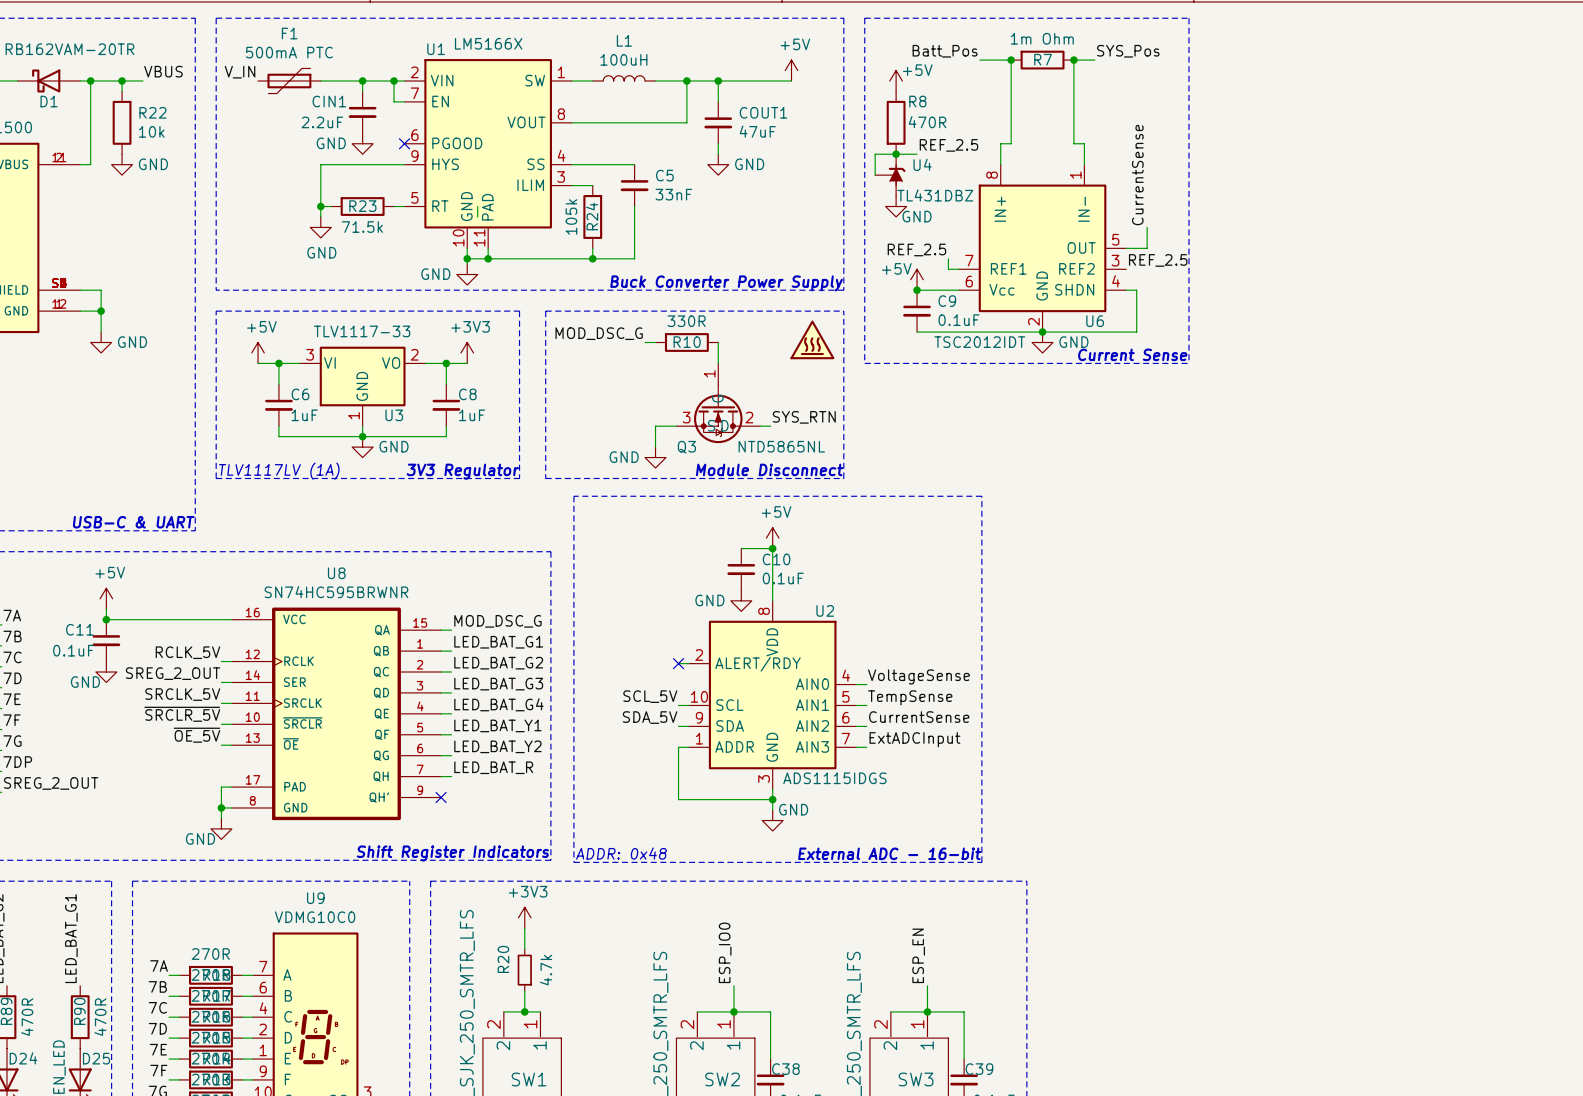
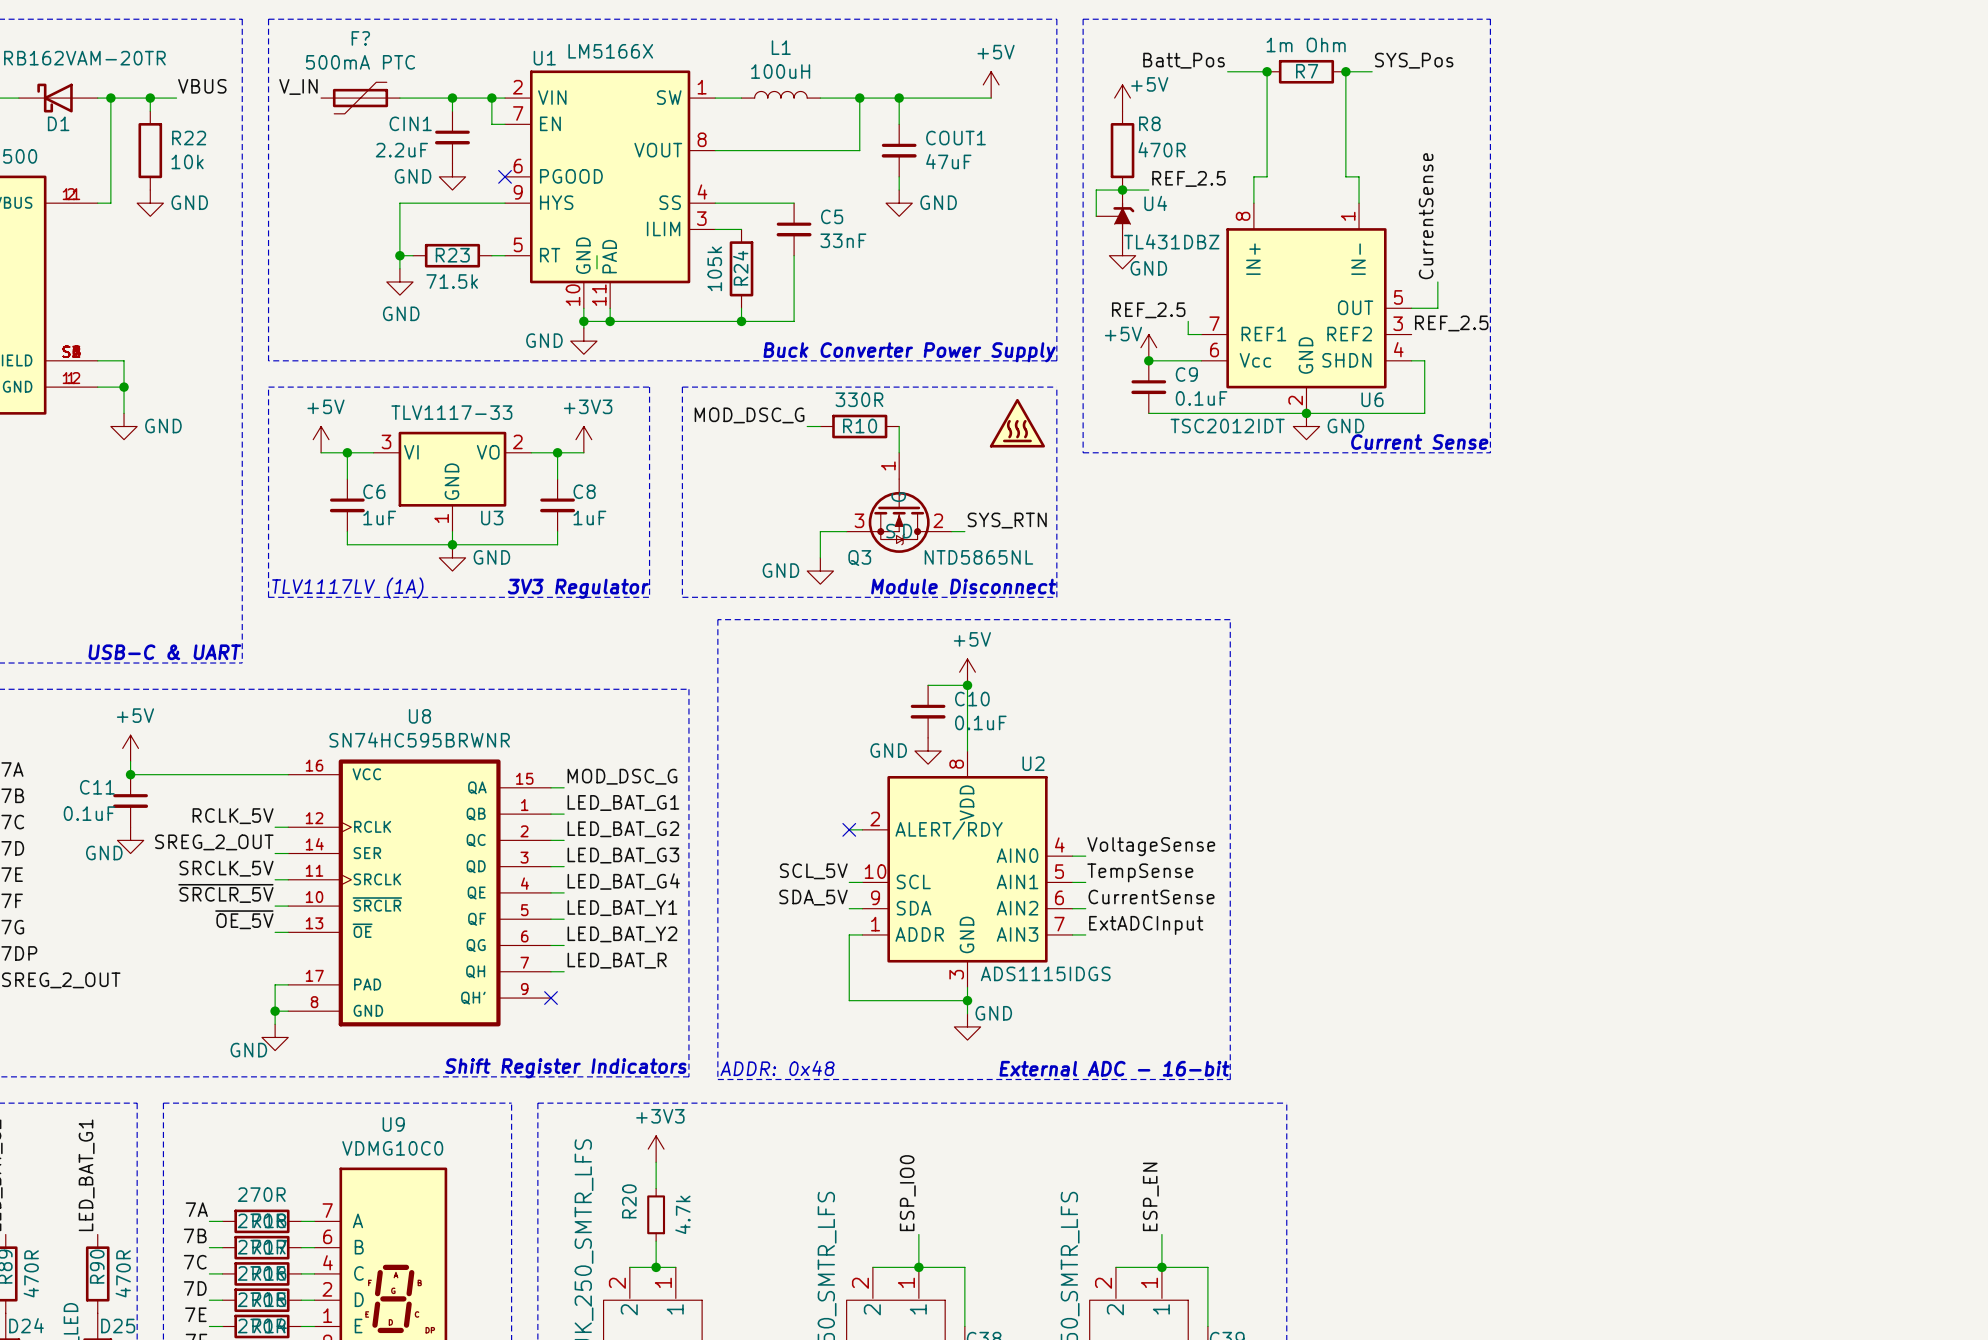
F1 name: F1 (289, 33) -> F? (360, 38)

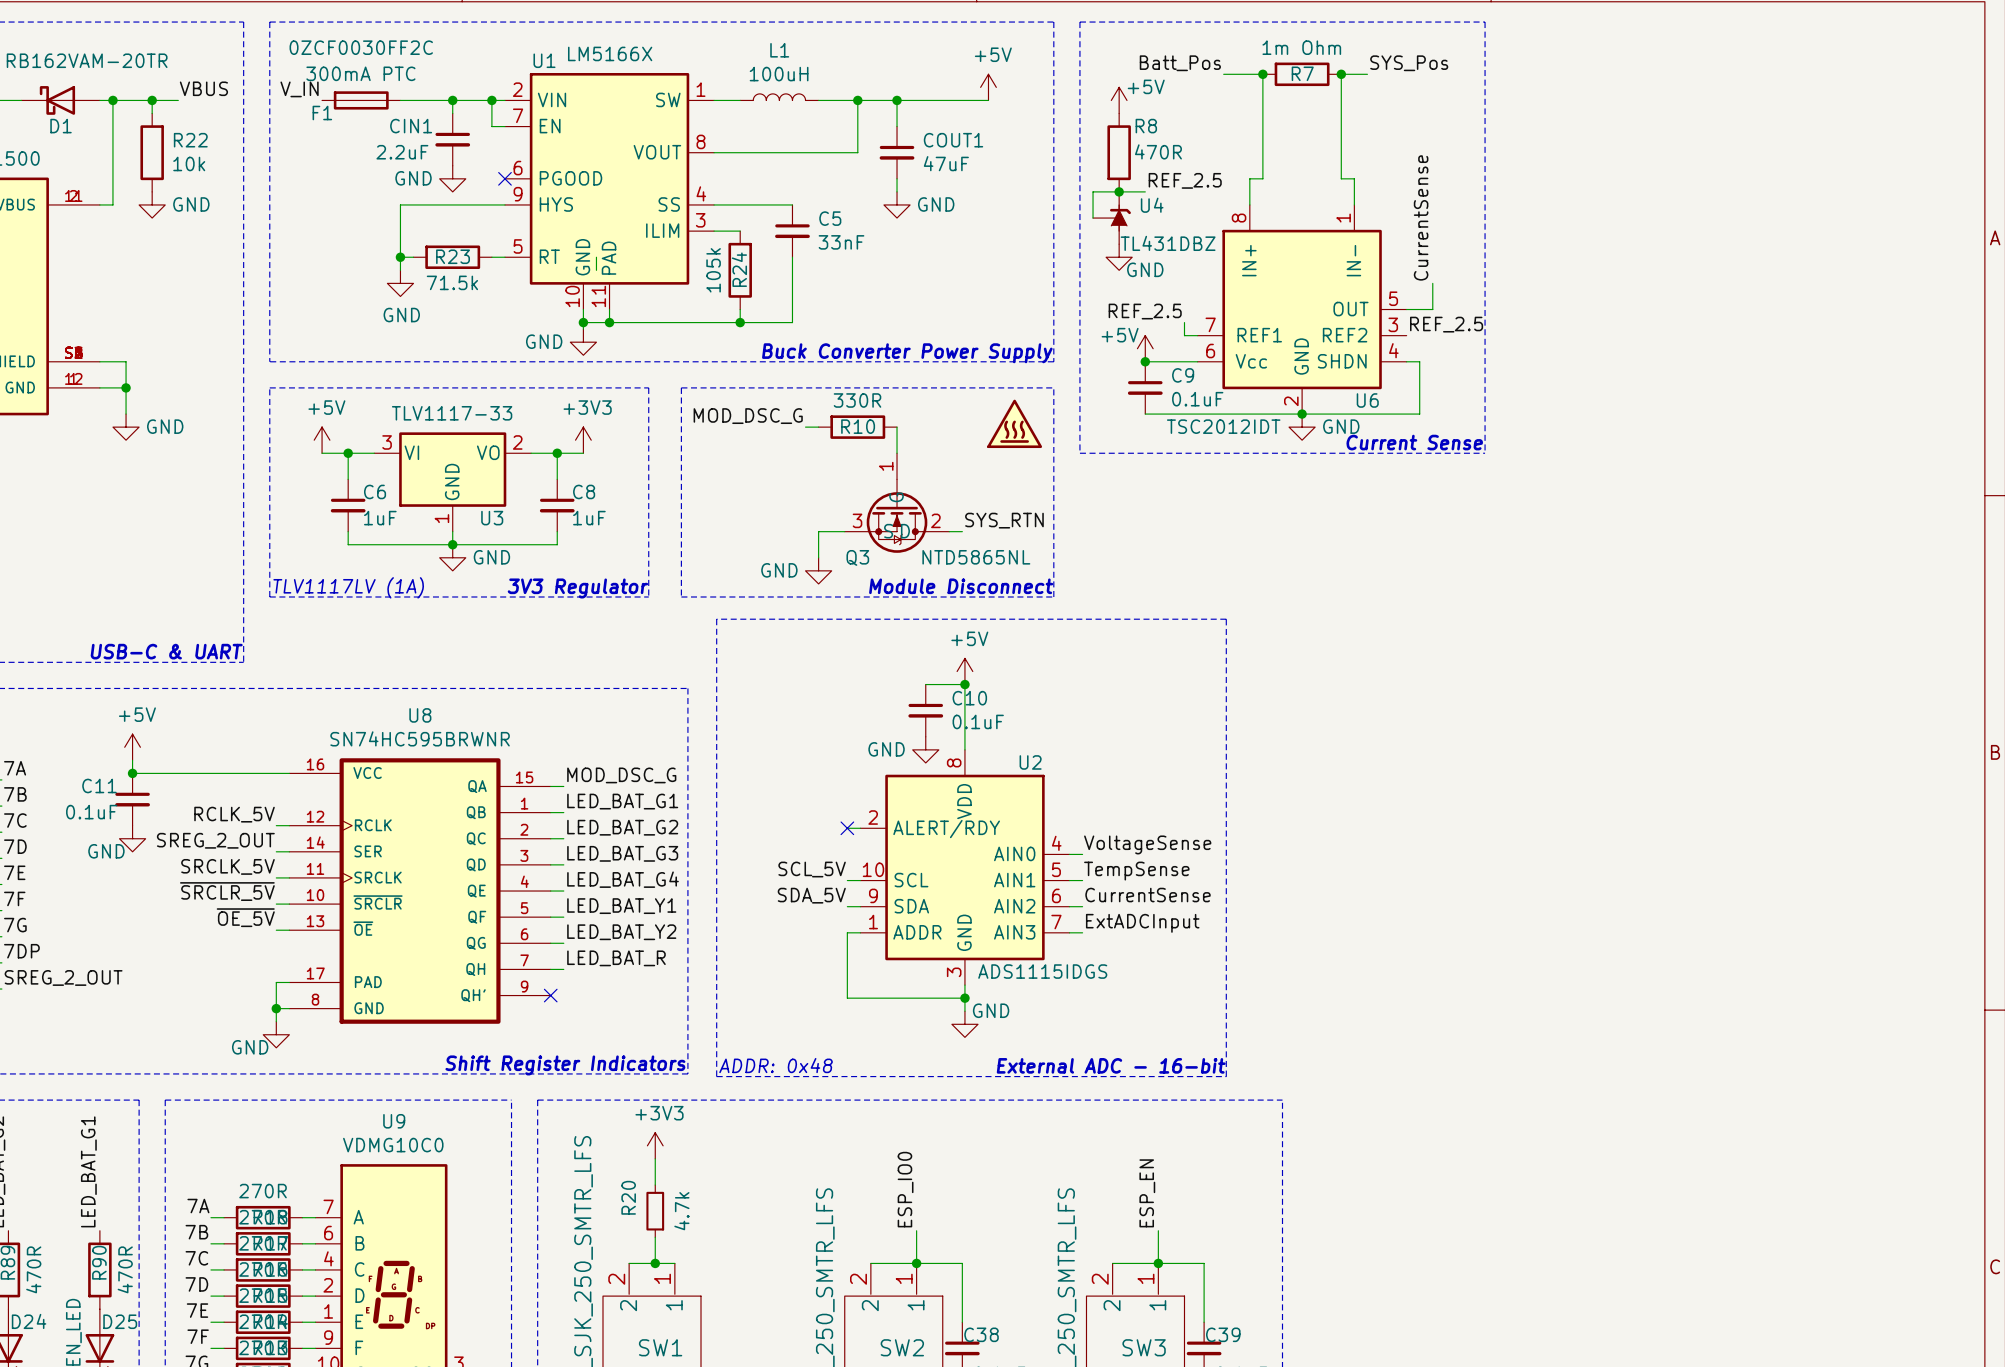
F?: 500mA PTC (360, 98) -> none
F1: none -> 0ZCF0030FF2C (361, 100)

